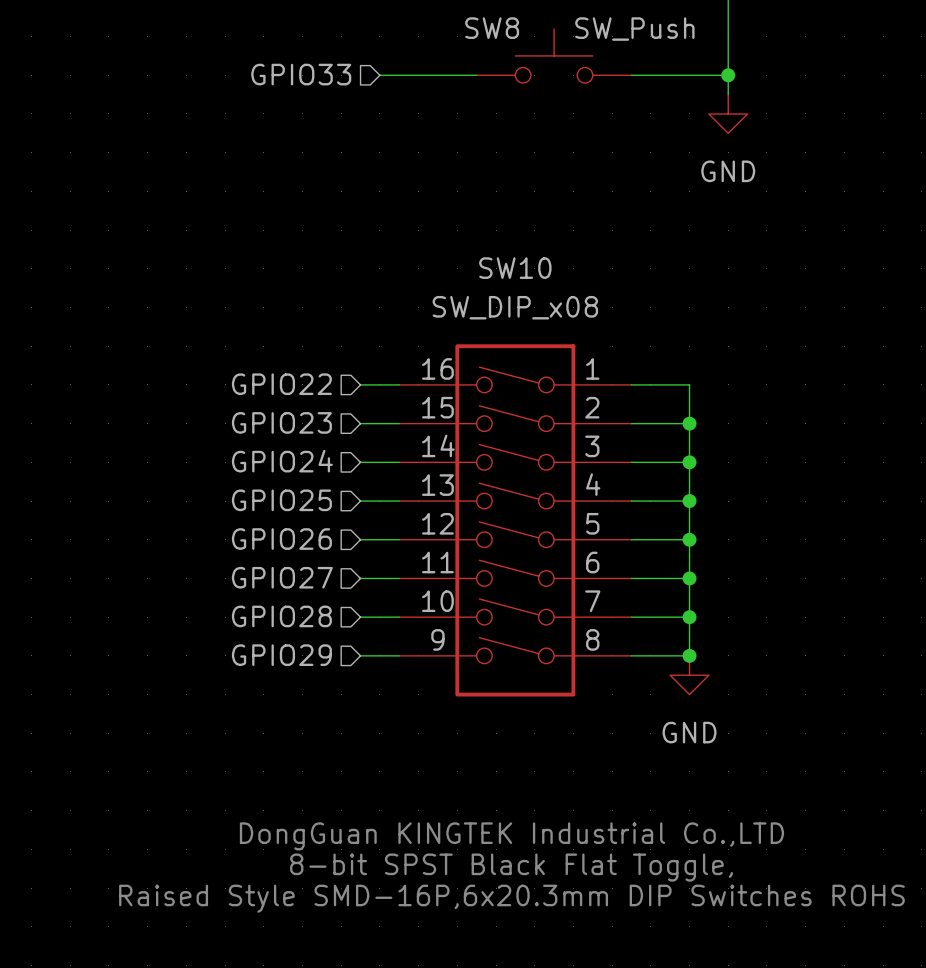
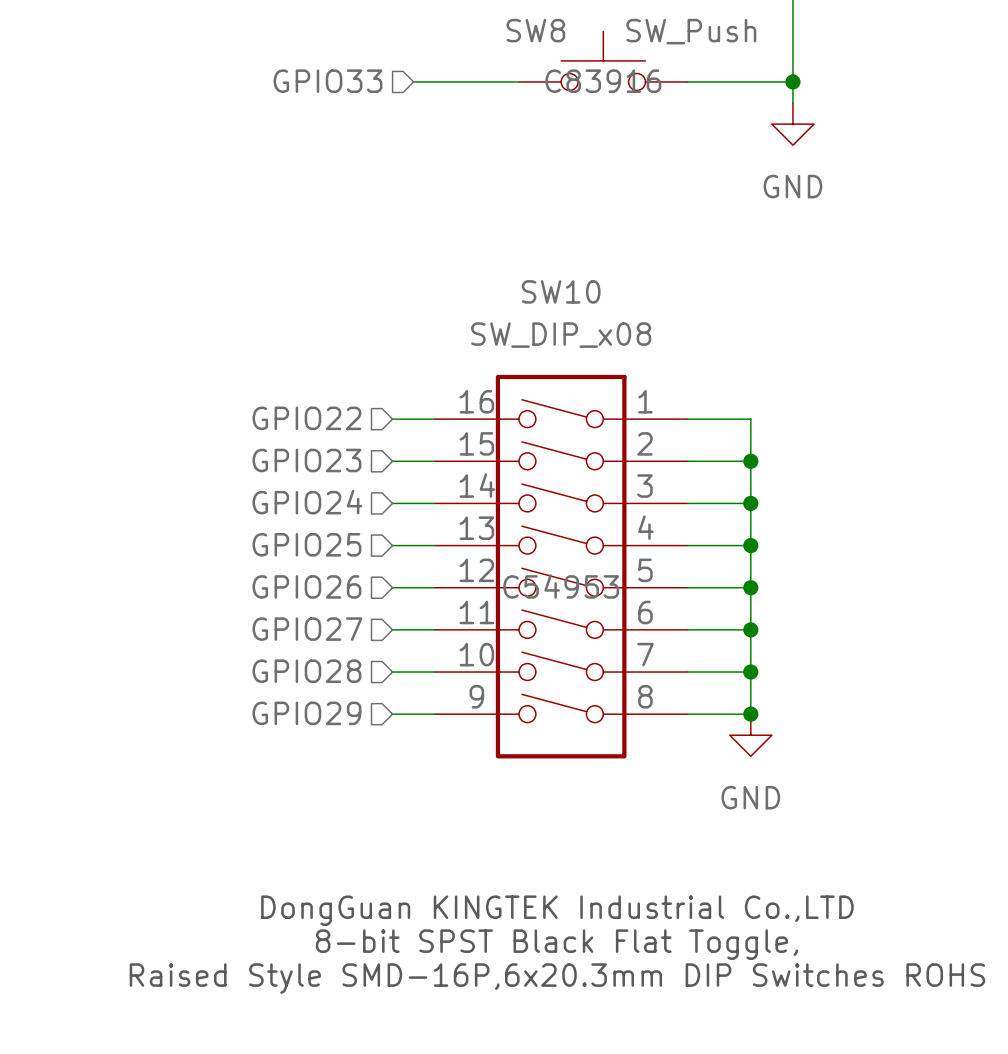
SW8 text: none -> C83916 (603, 81)
SW10 text: none -> C54953 (561, 586)

